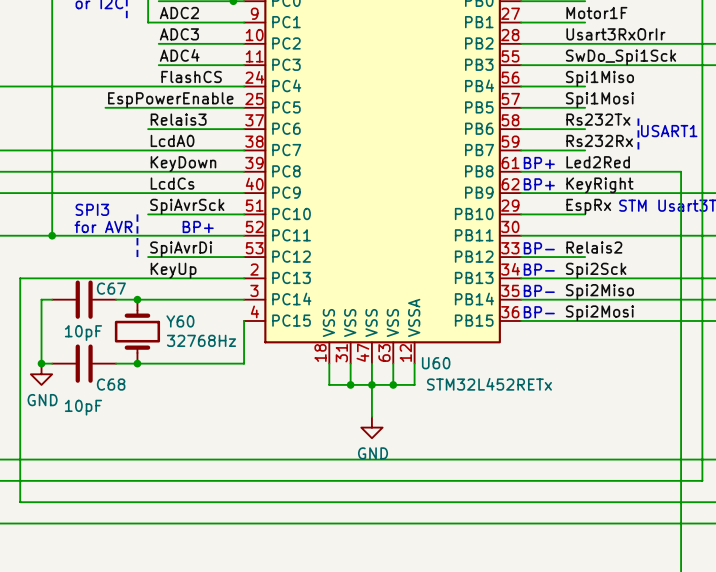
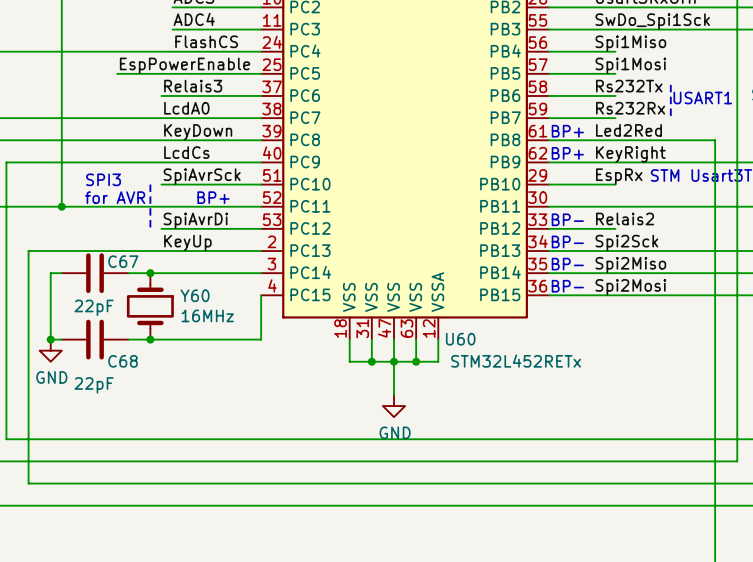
C67 value: 10pF (83, 333) -> 22pF (94, 307)
Y60 value: 32768Hz (201, 340) -> 16MHz (207, 315)
C68 value: 10pF (83, 407) -> 22pF (94, 385)

